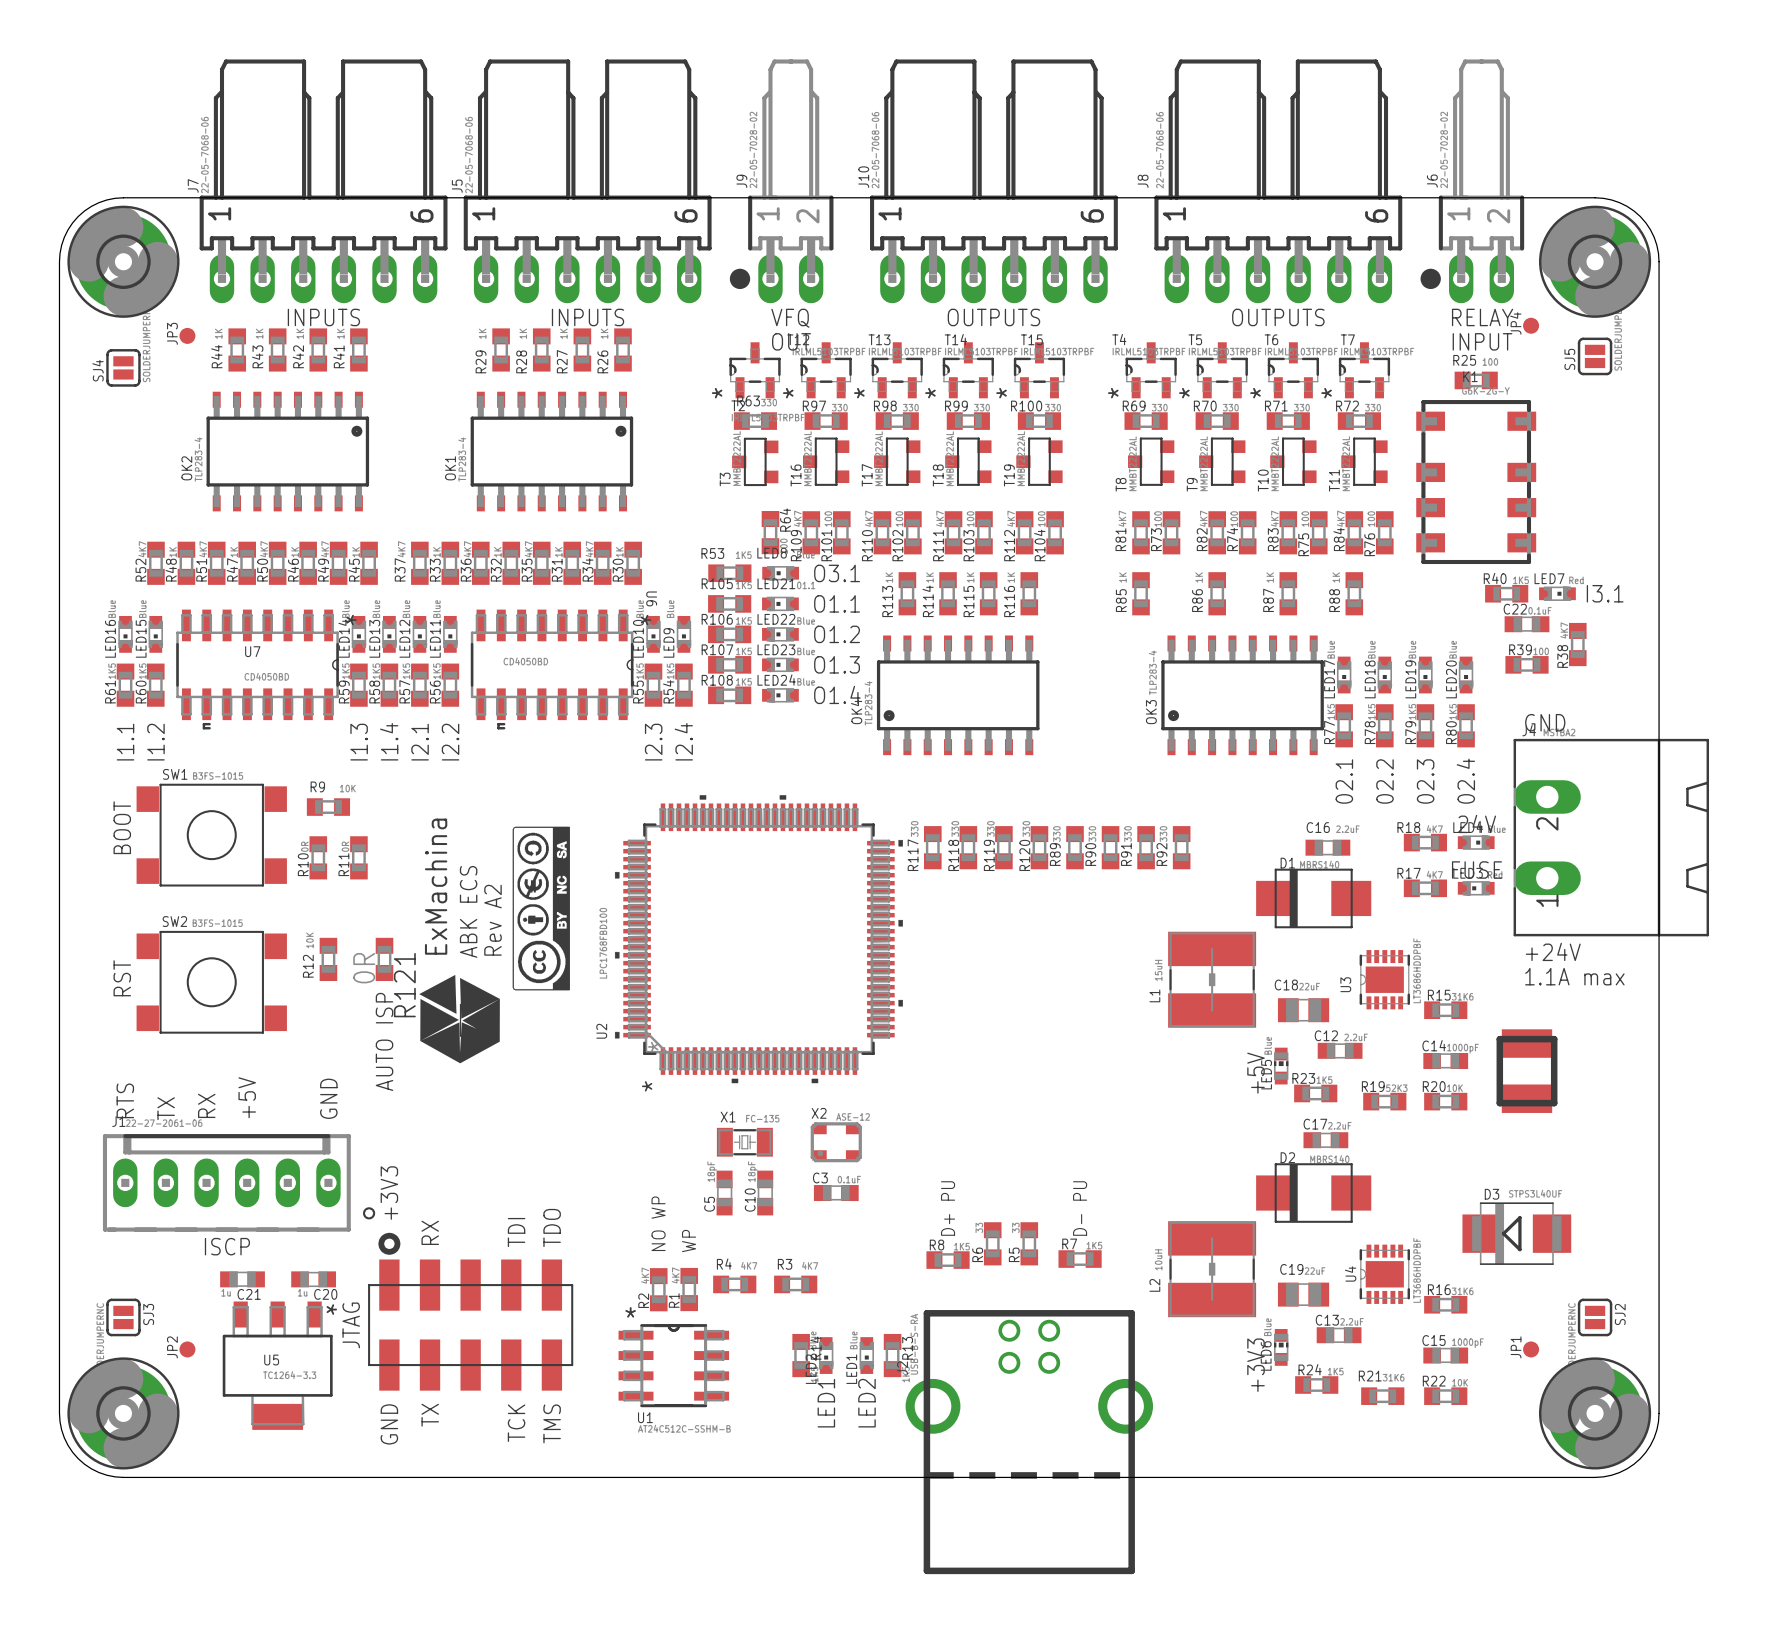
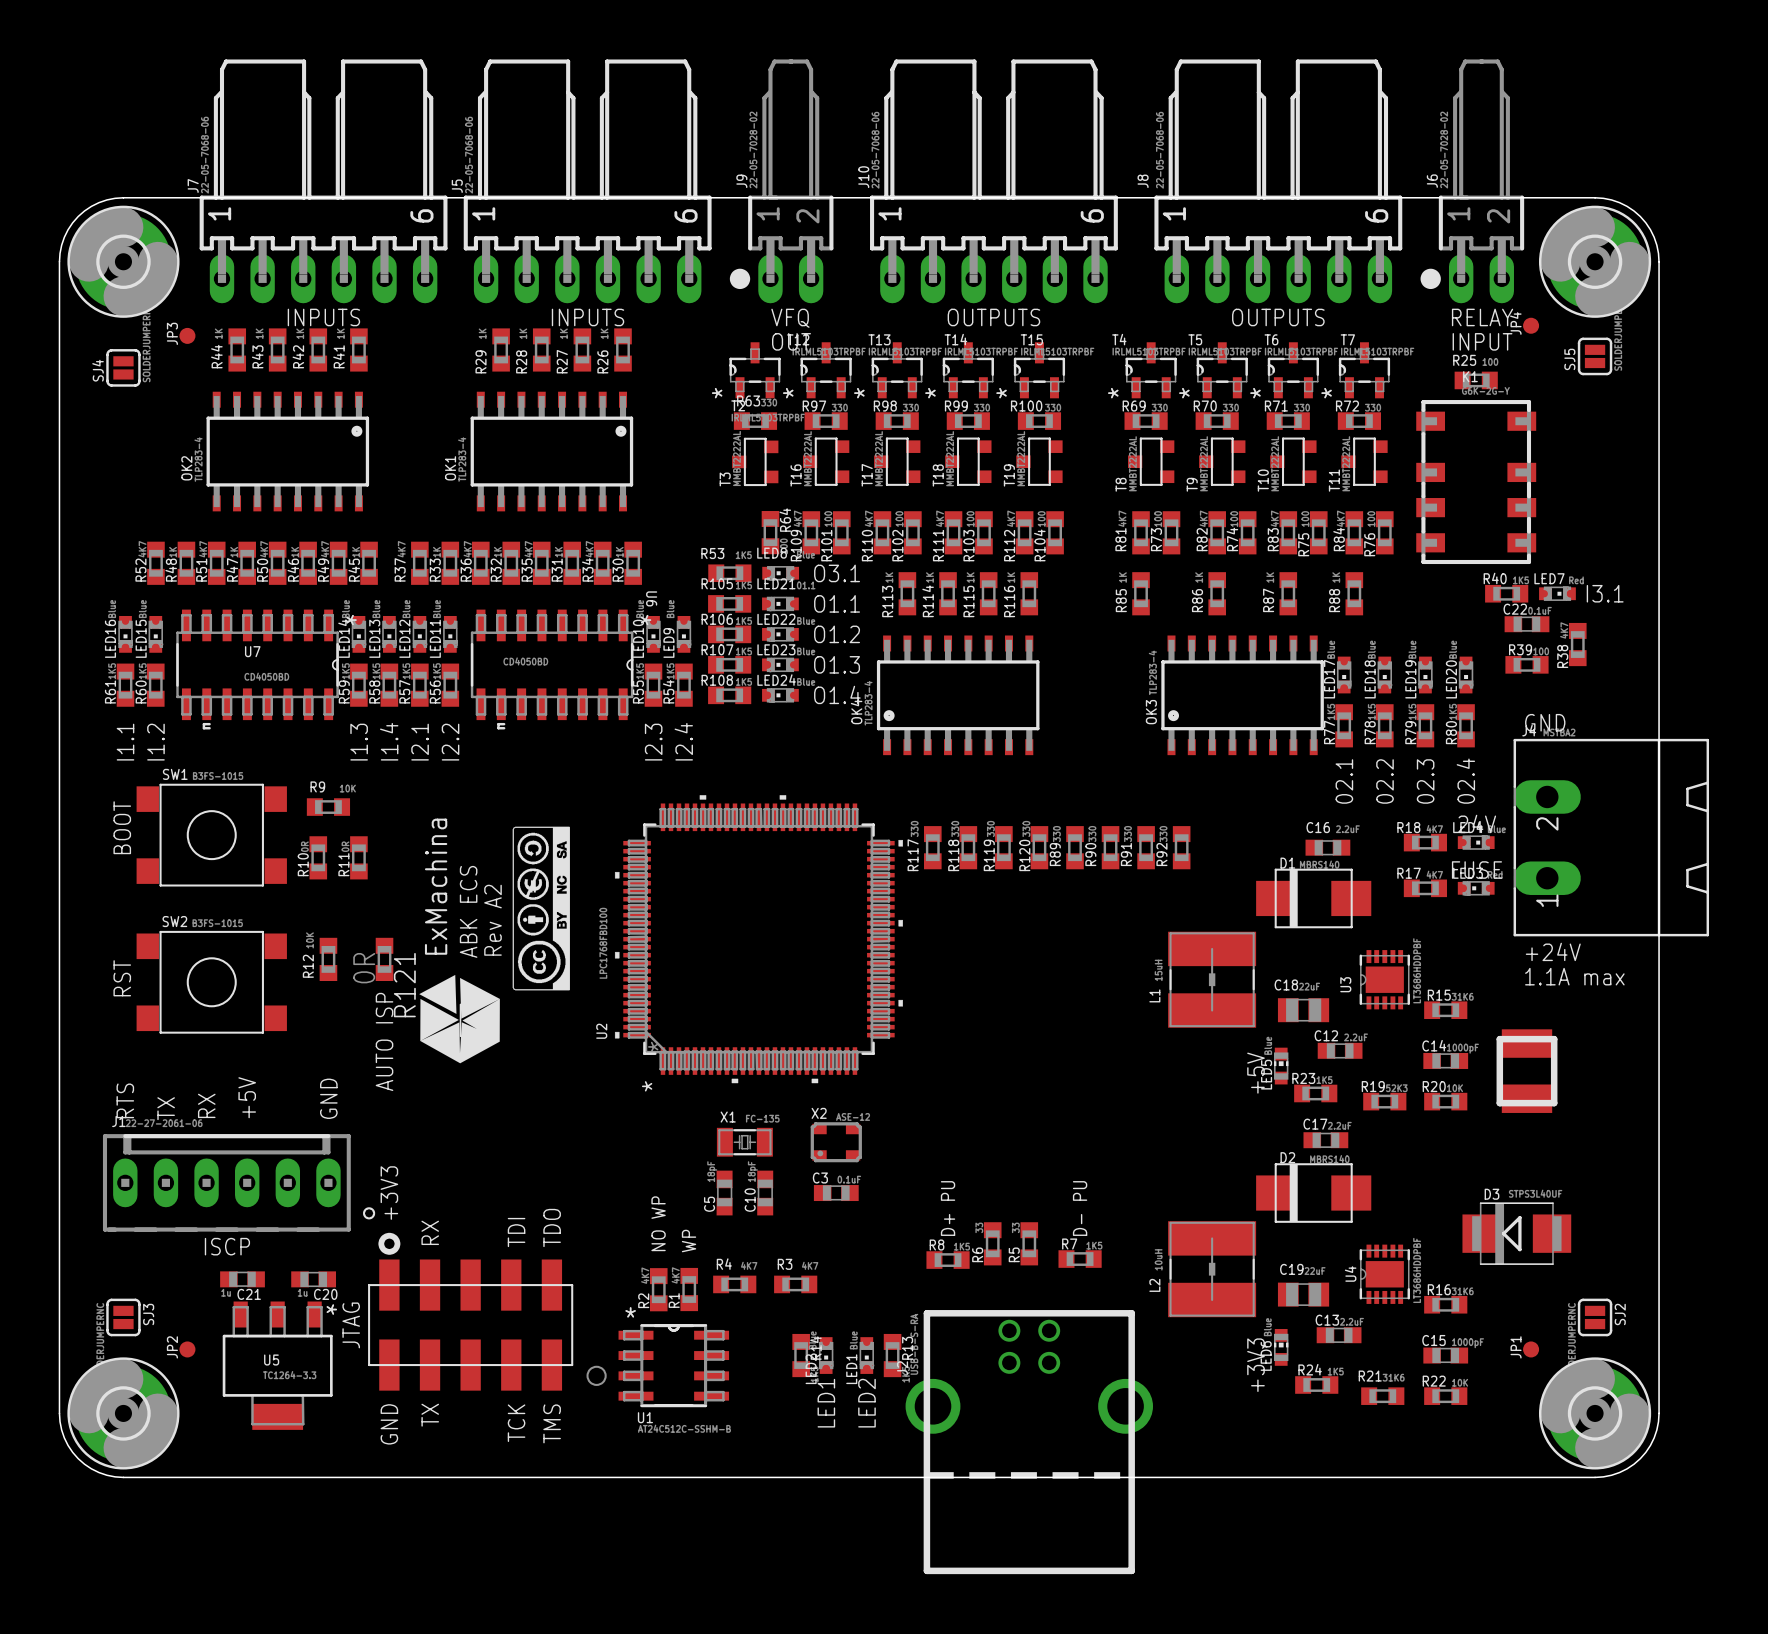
part: none -> (596, 1375)

